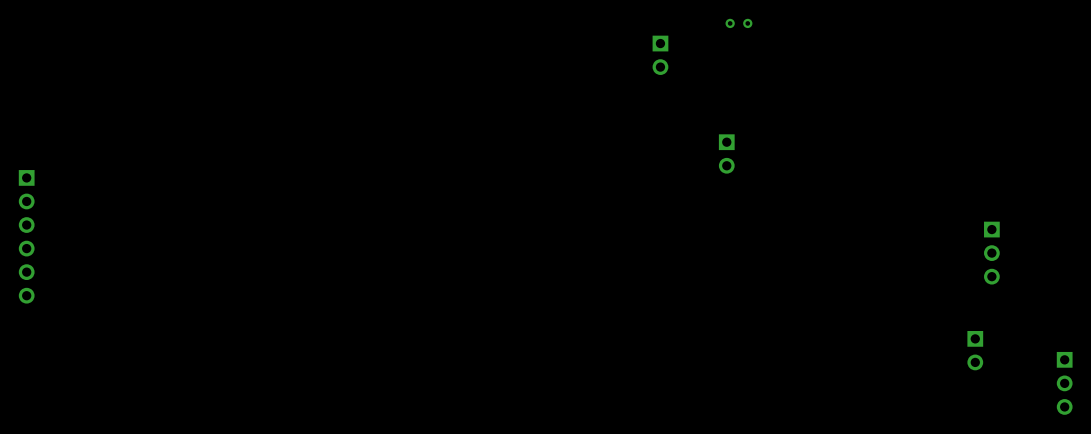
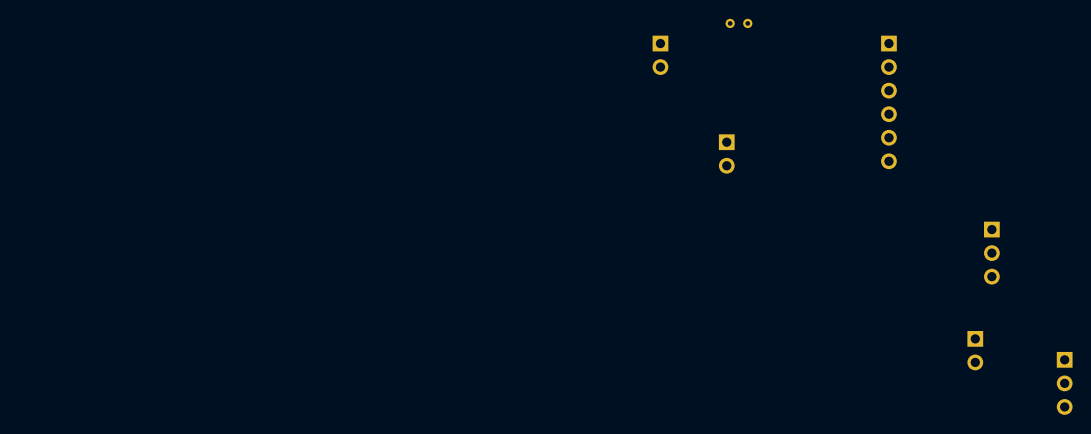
part: none -> (888, 102)
part: (26, 236) -> none

